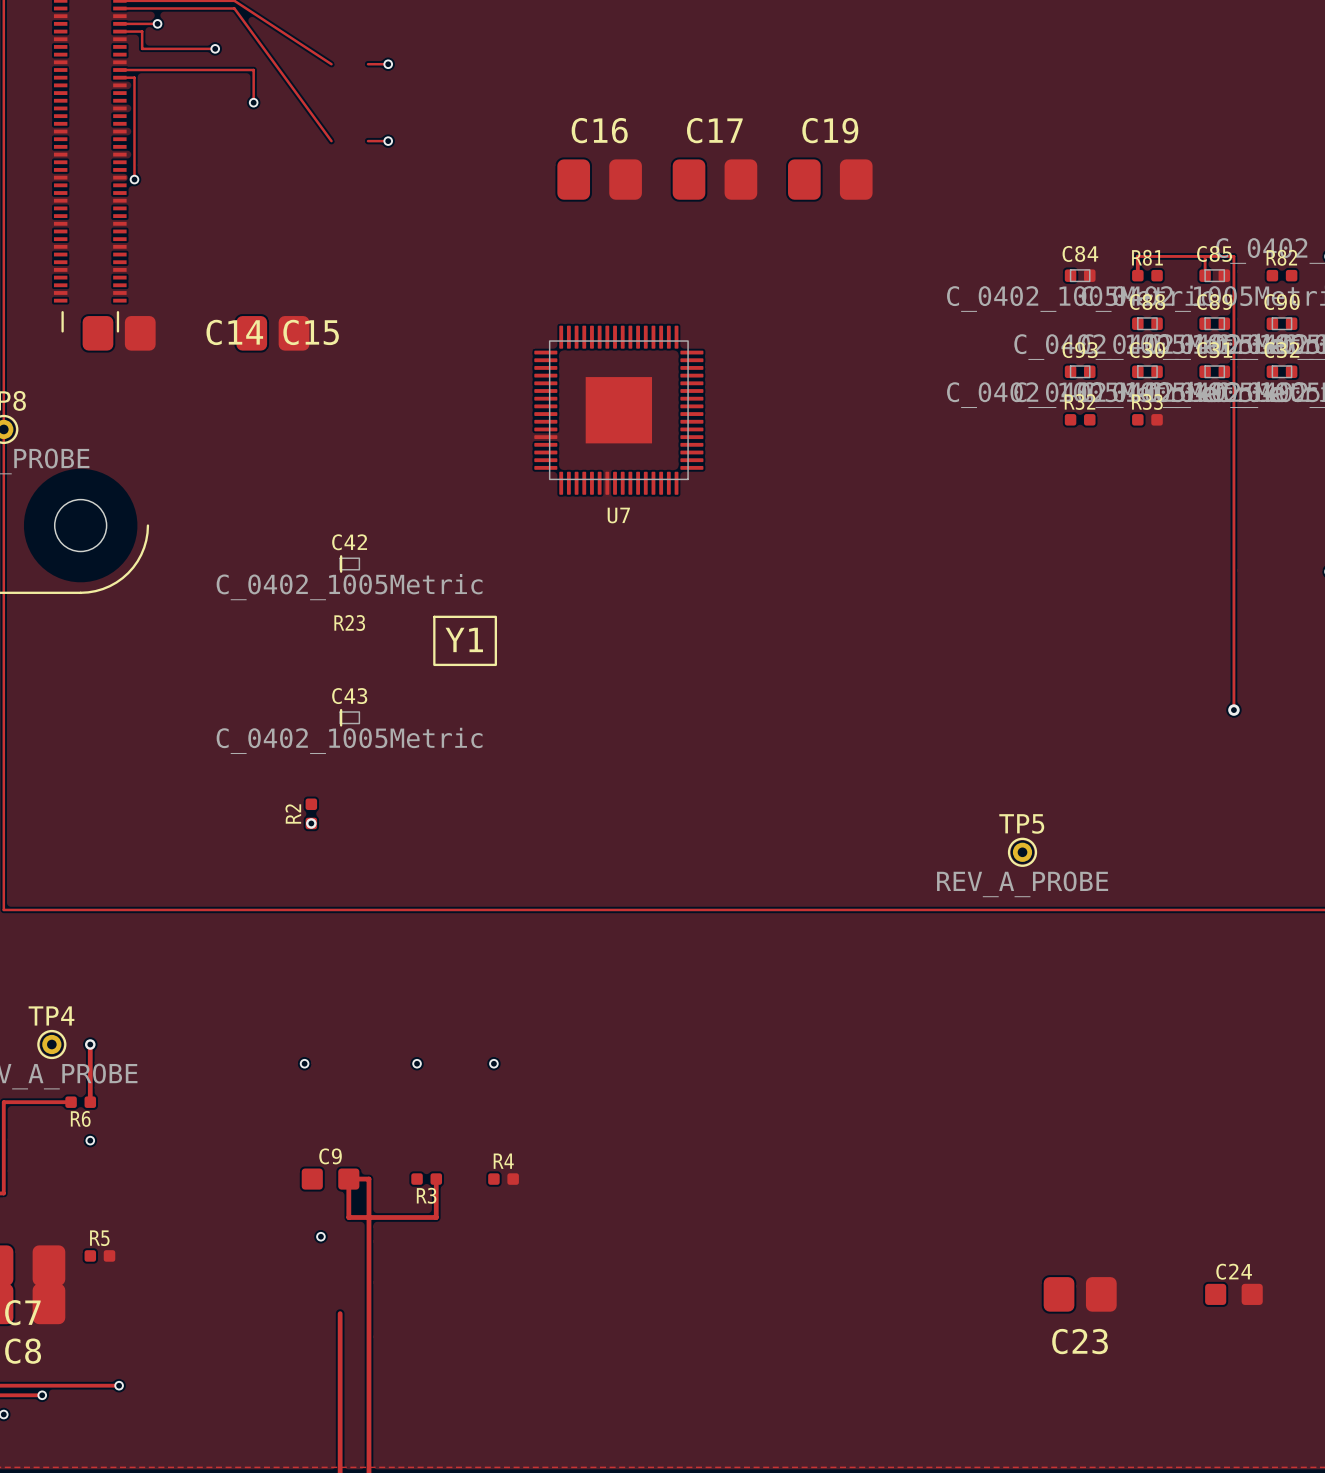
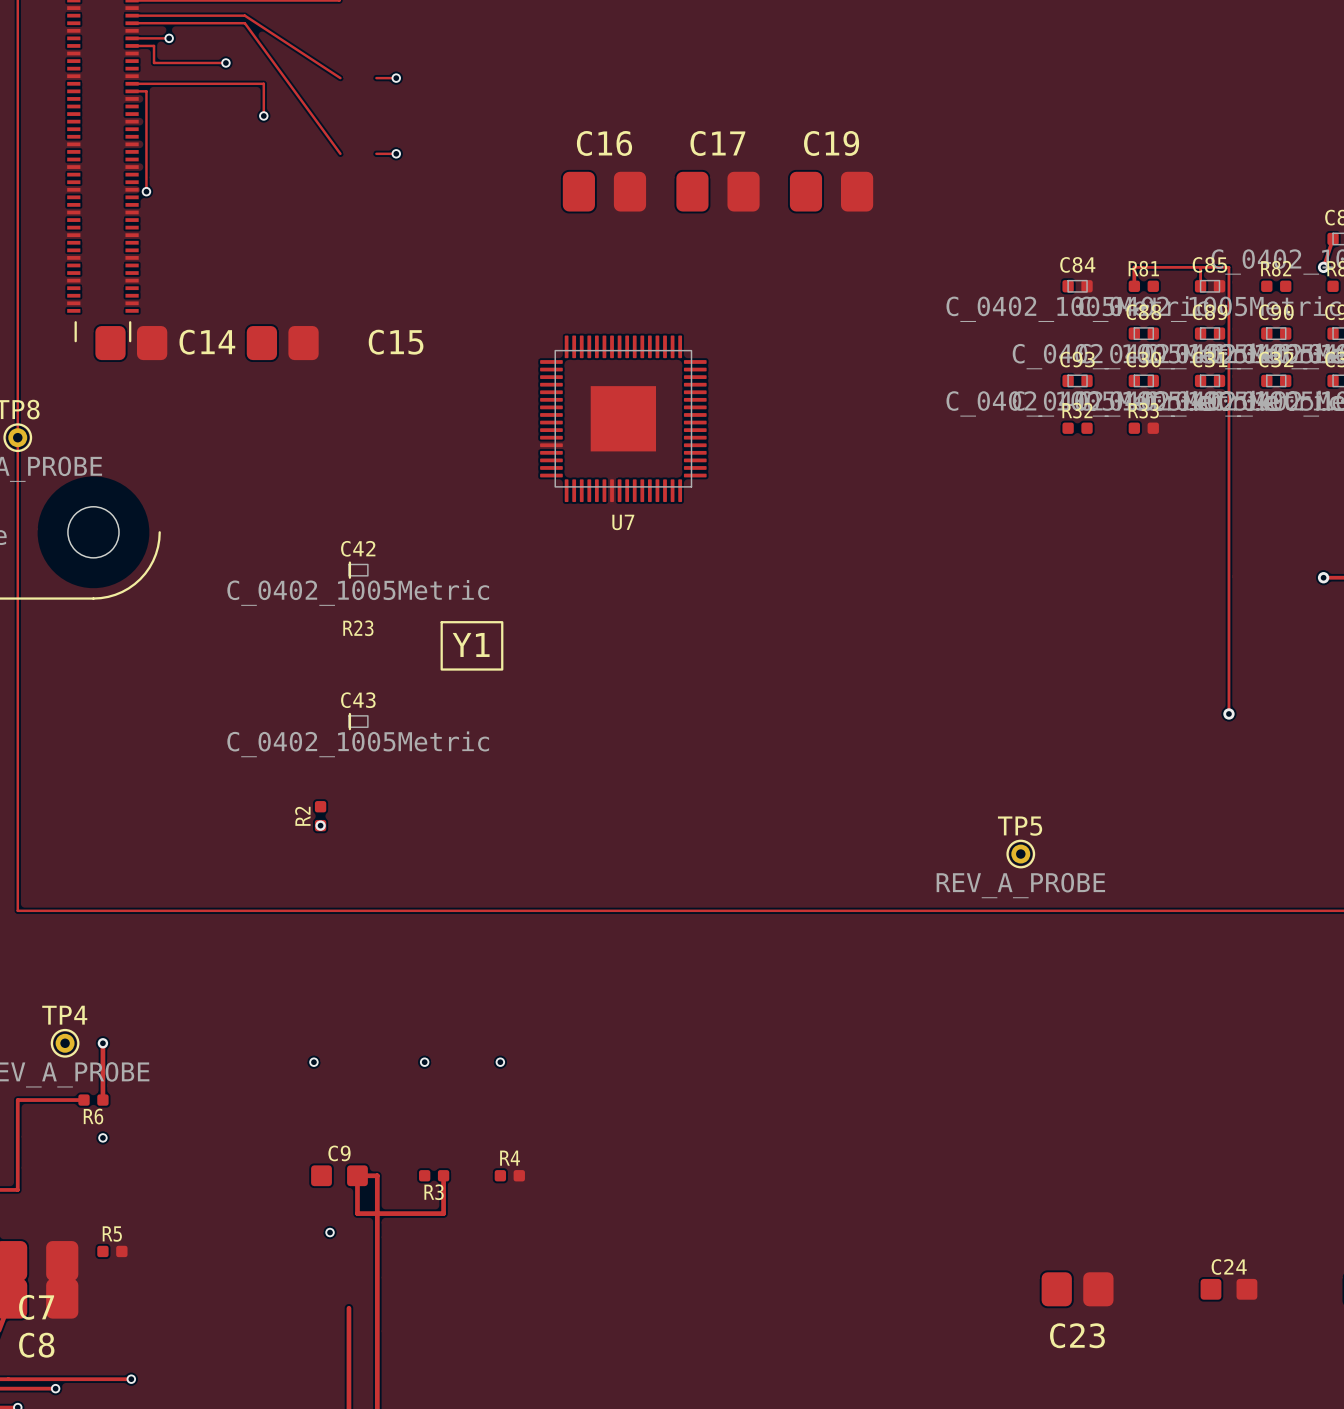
C14 name position: C14 (234, 332) -> C14 (207, 342)
C15 name position: C15 (311, 332) -> C15 (396, 342)

